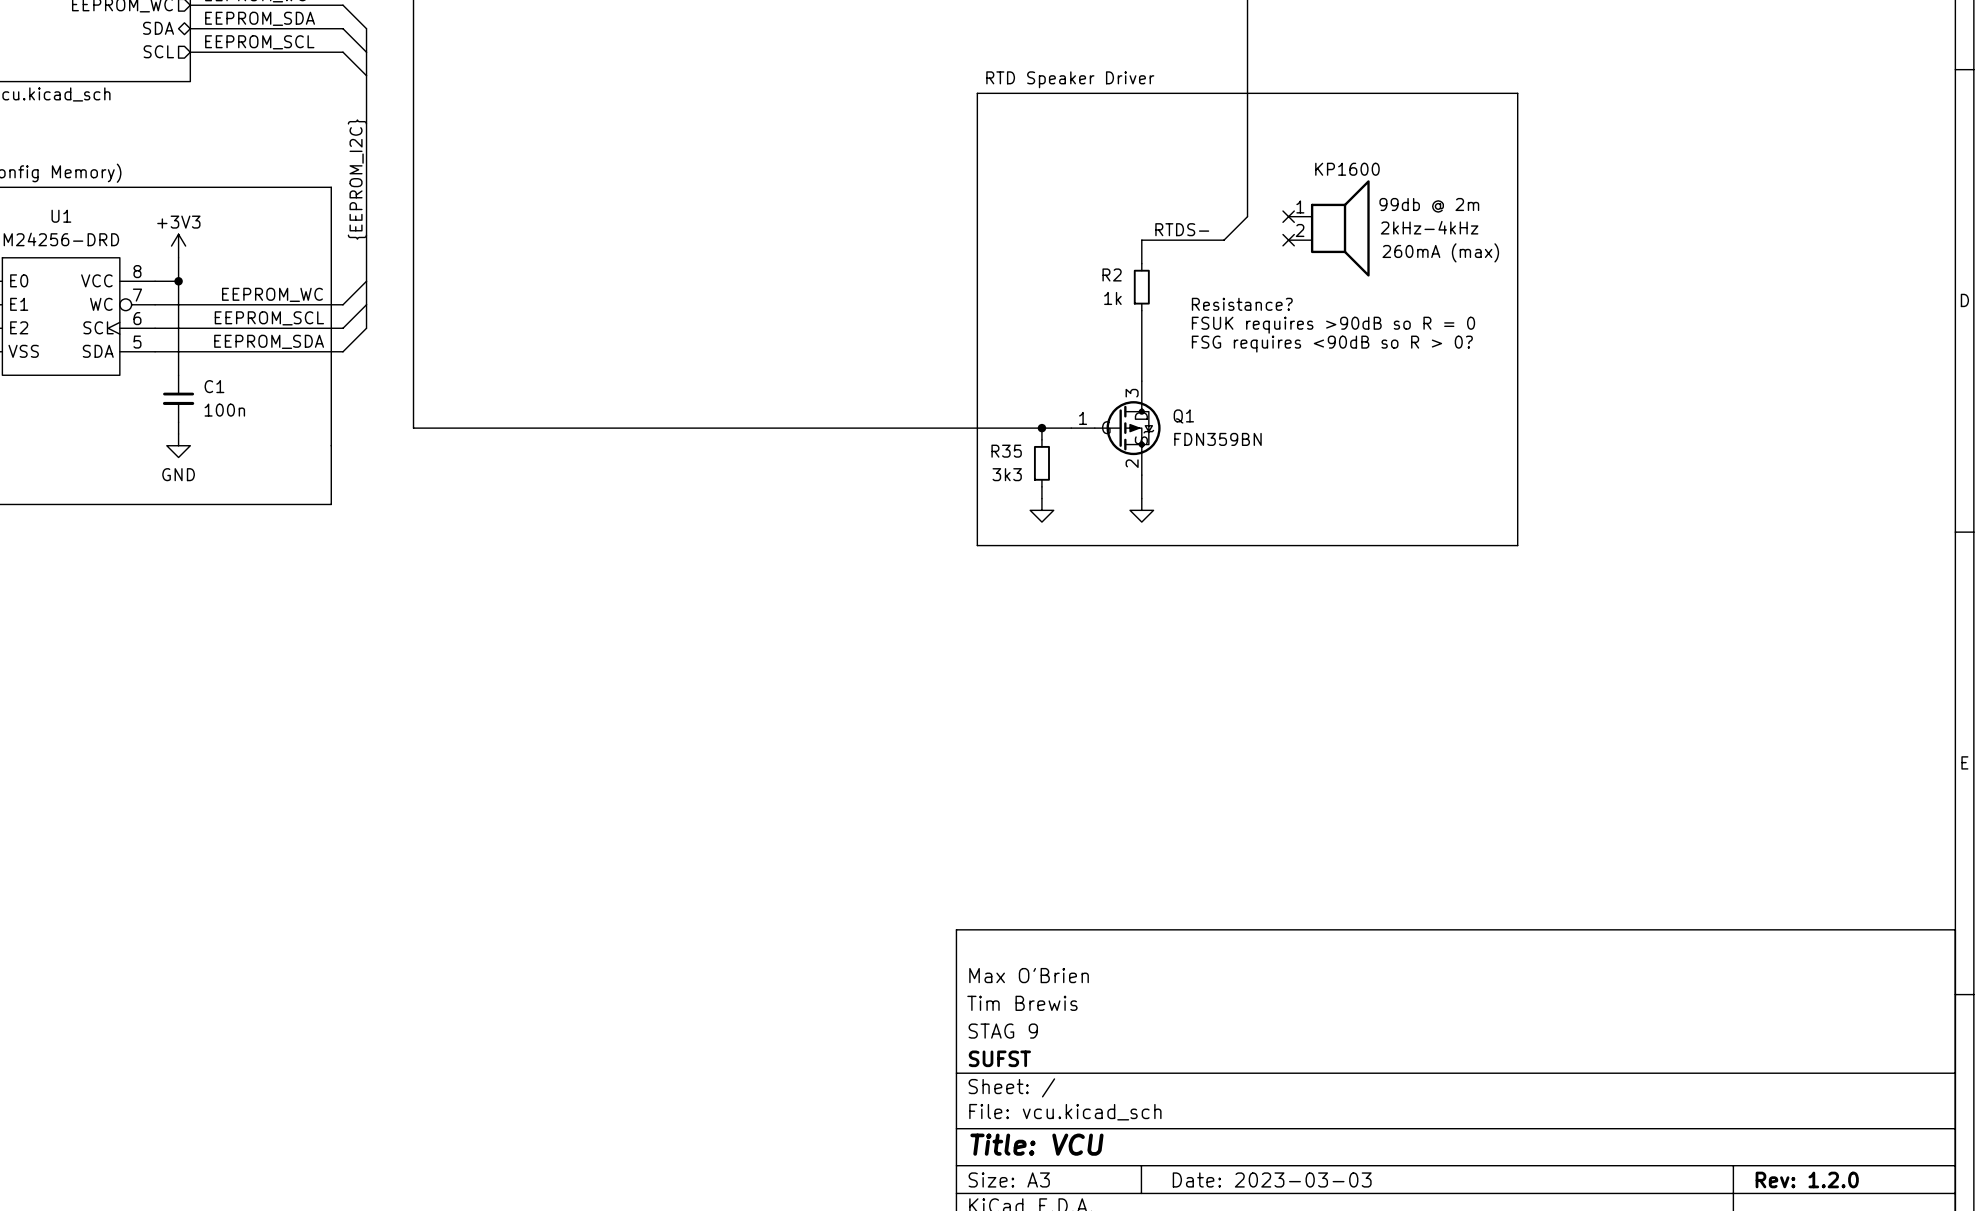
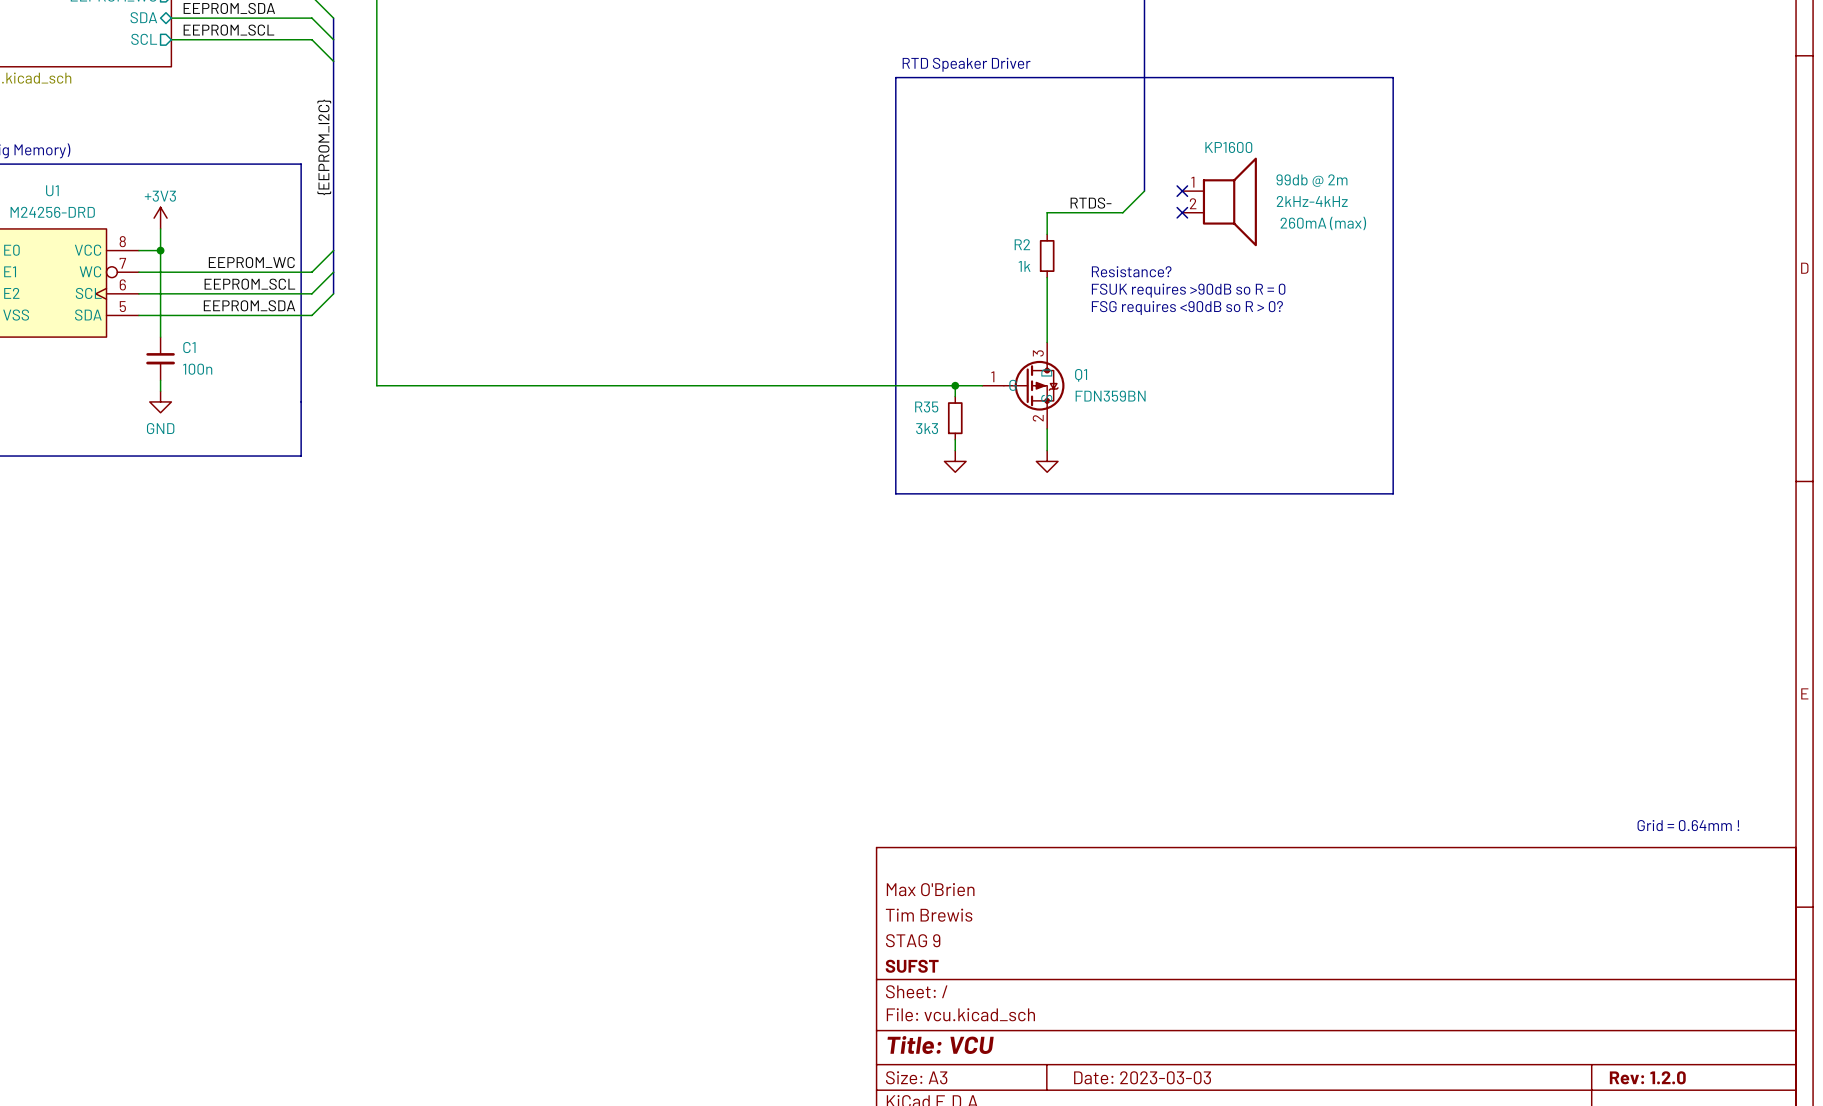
text: none -> Grid = 0.64mm ! (1688, 825)

